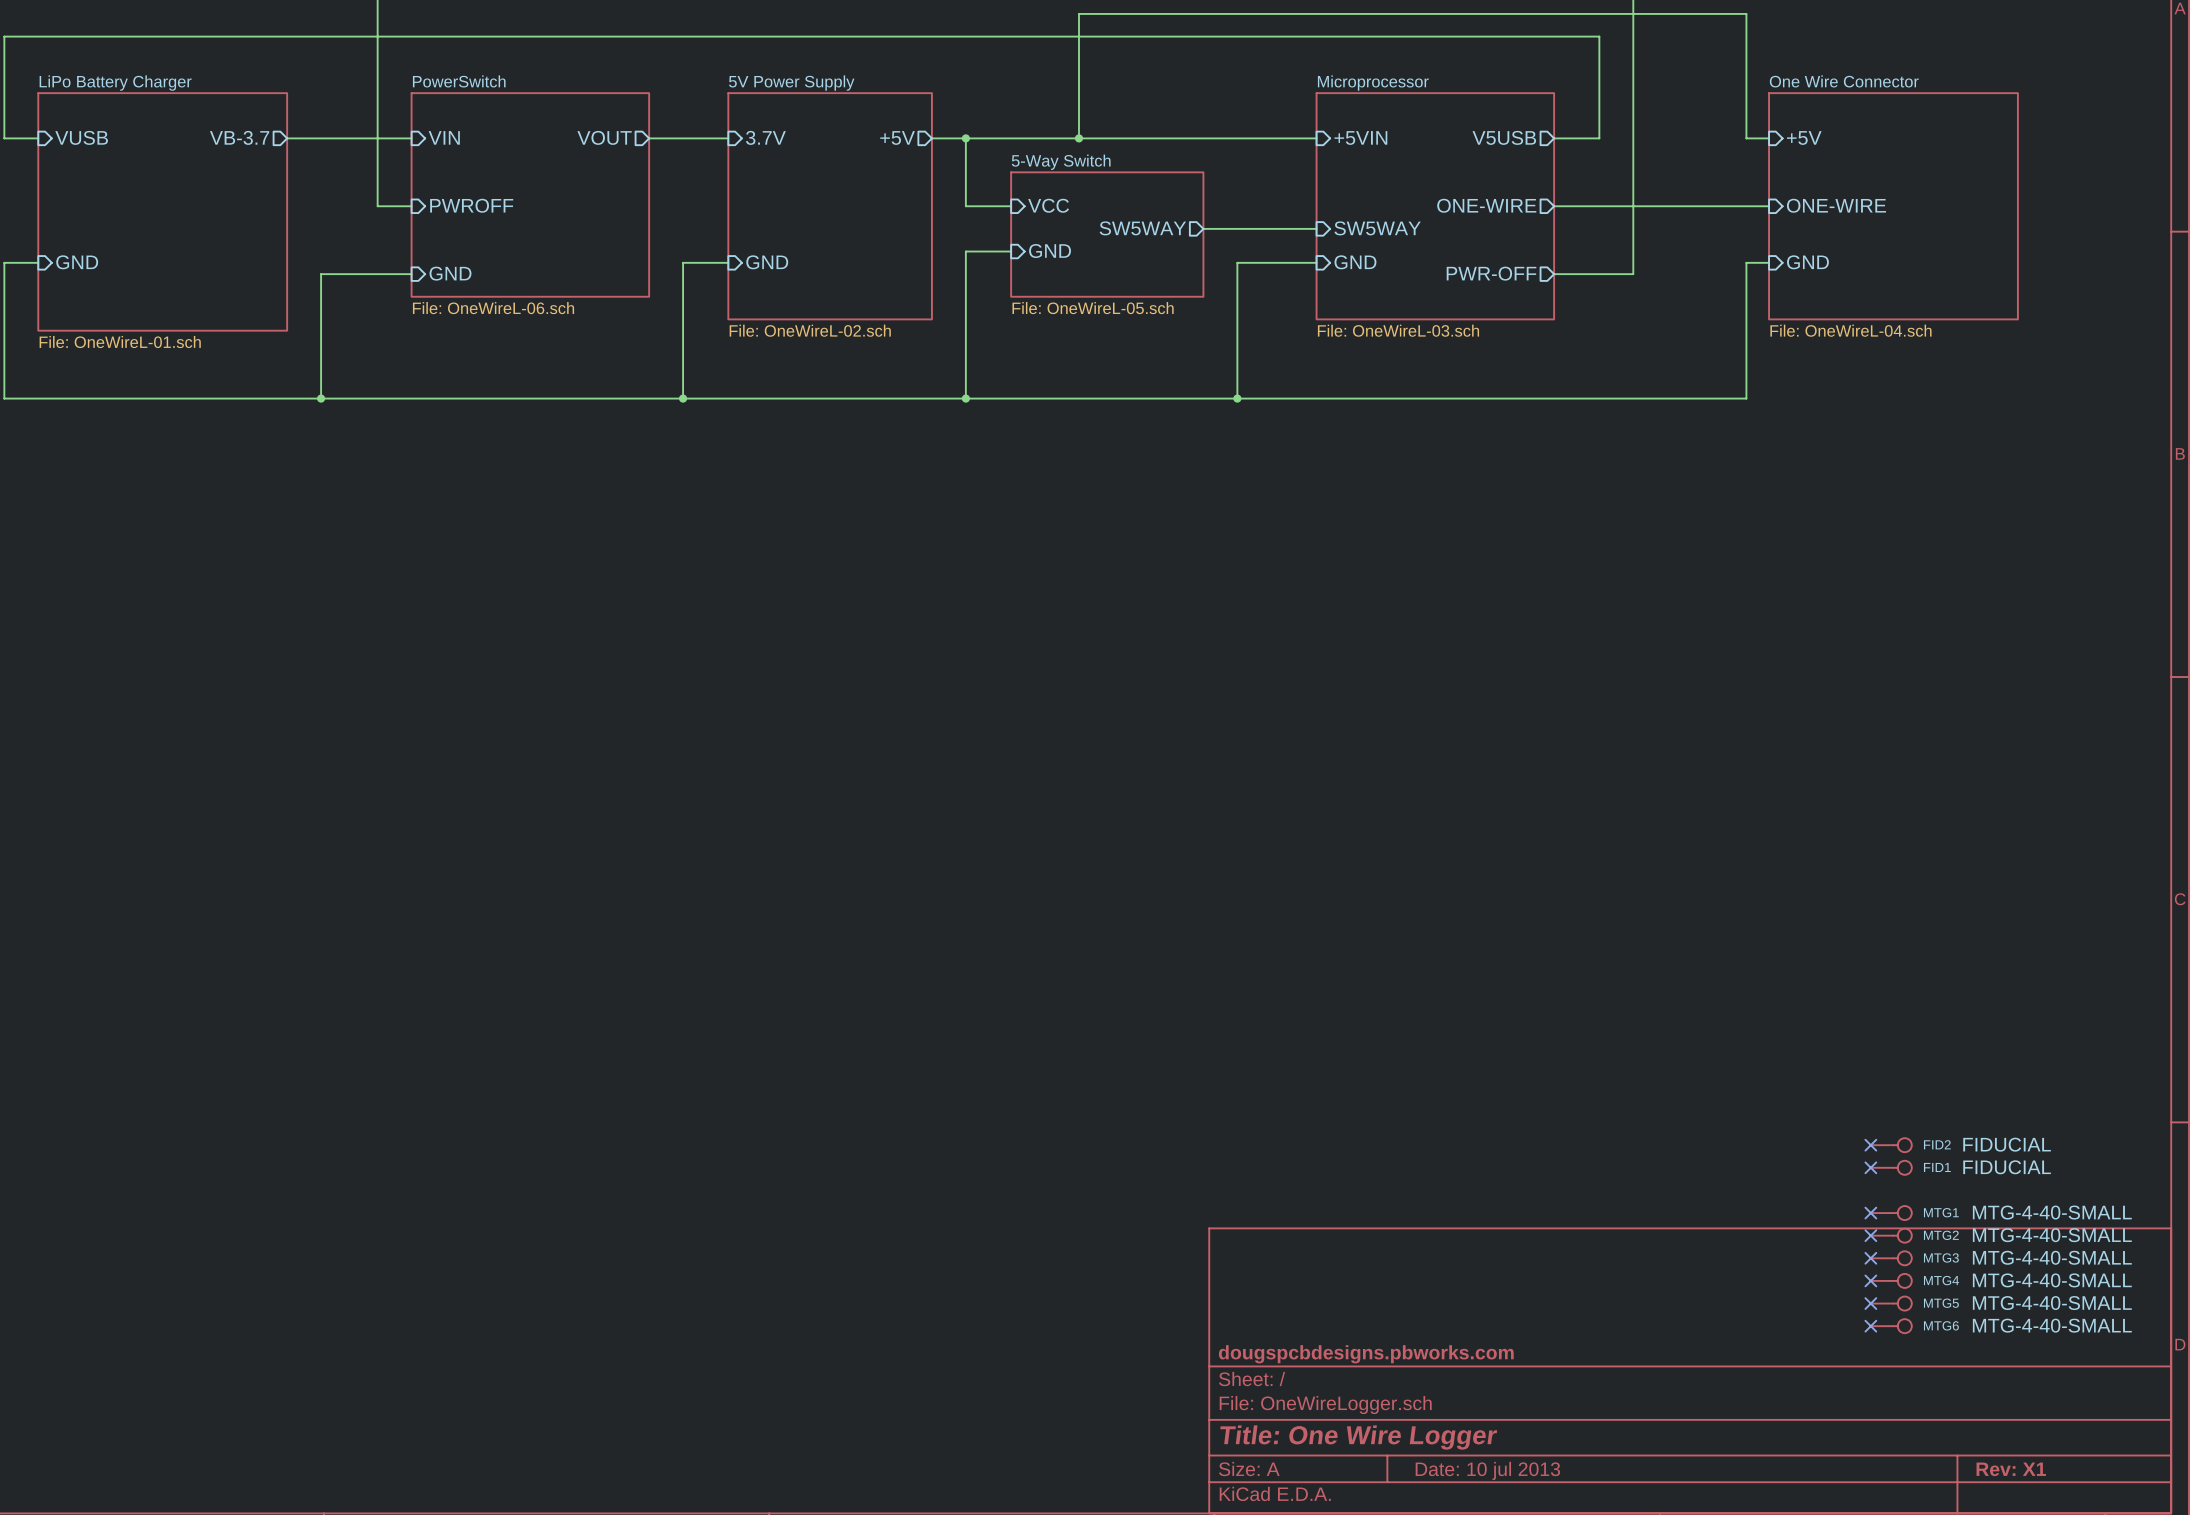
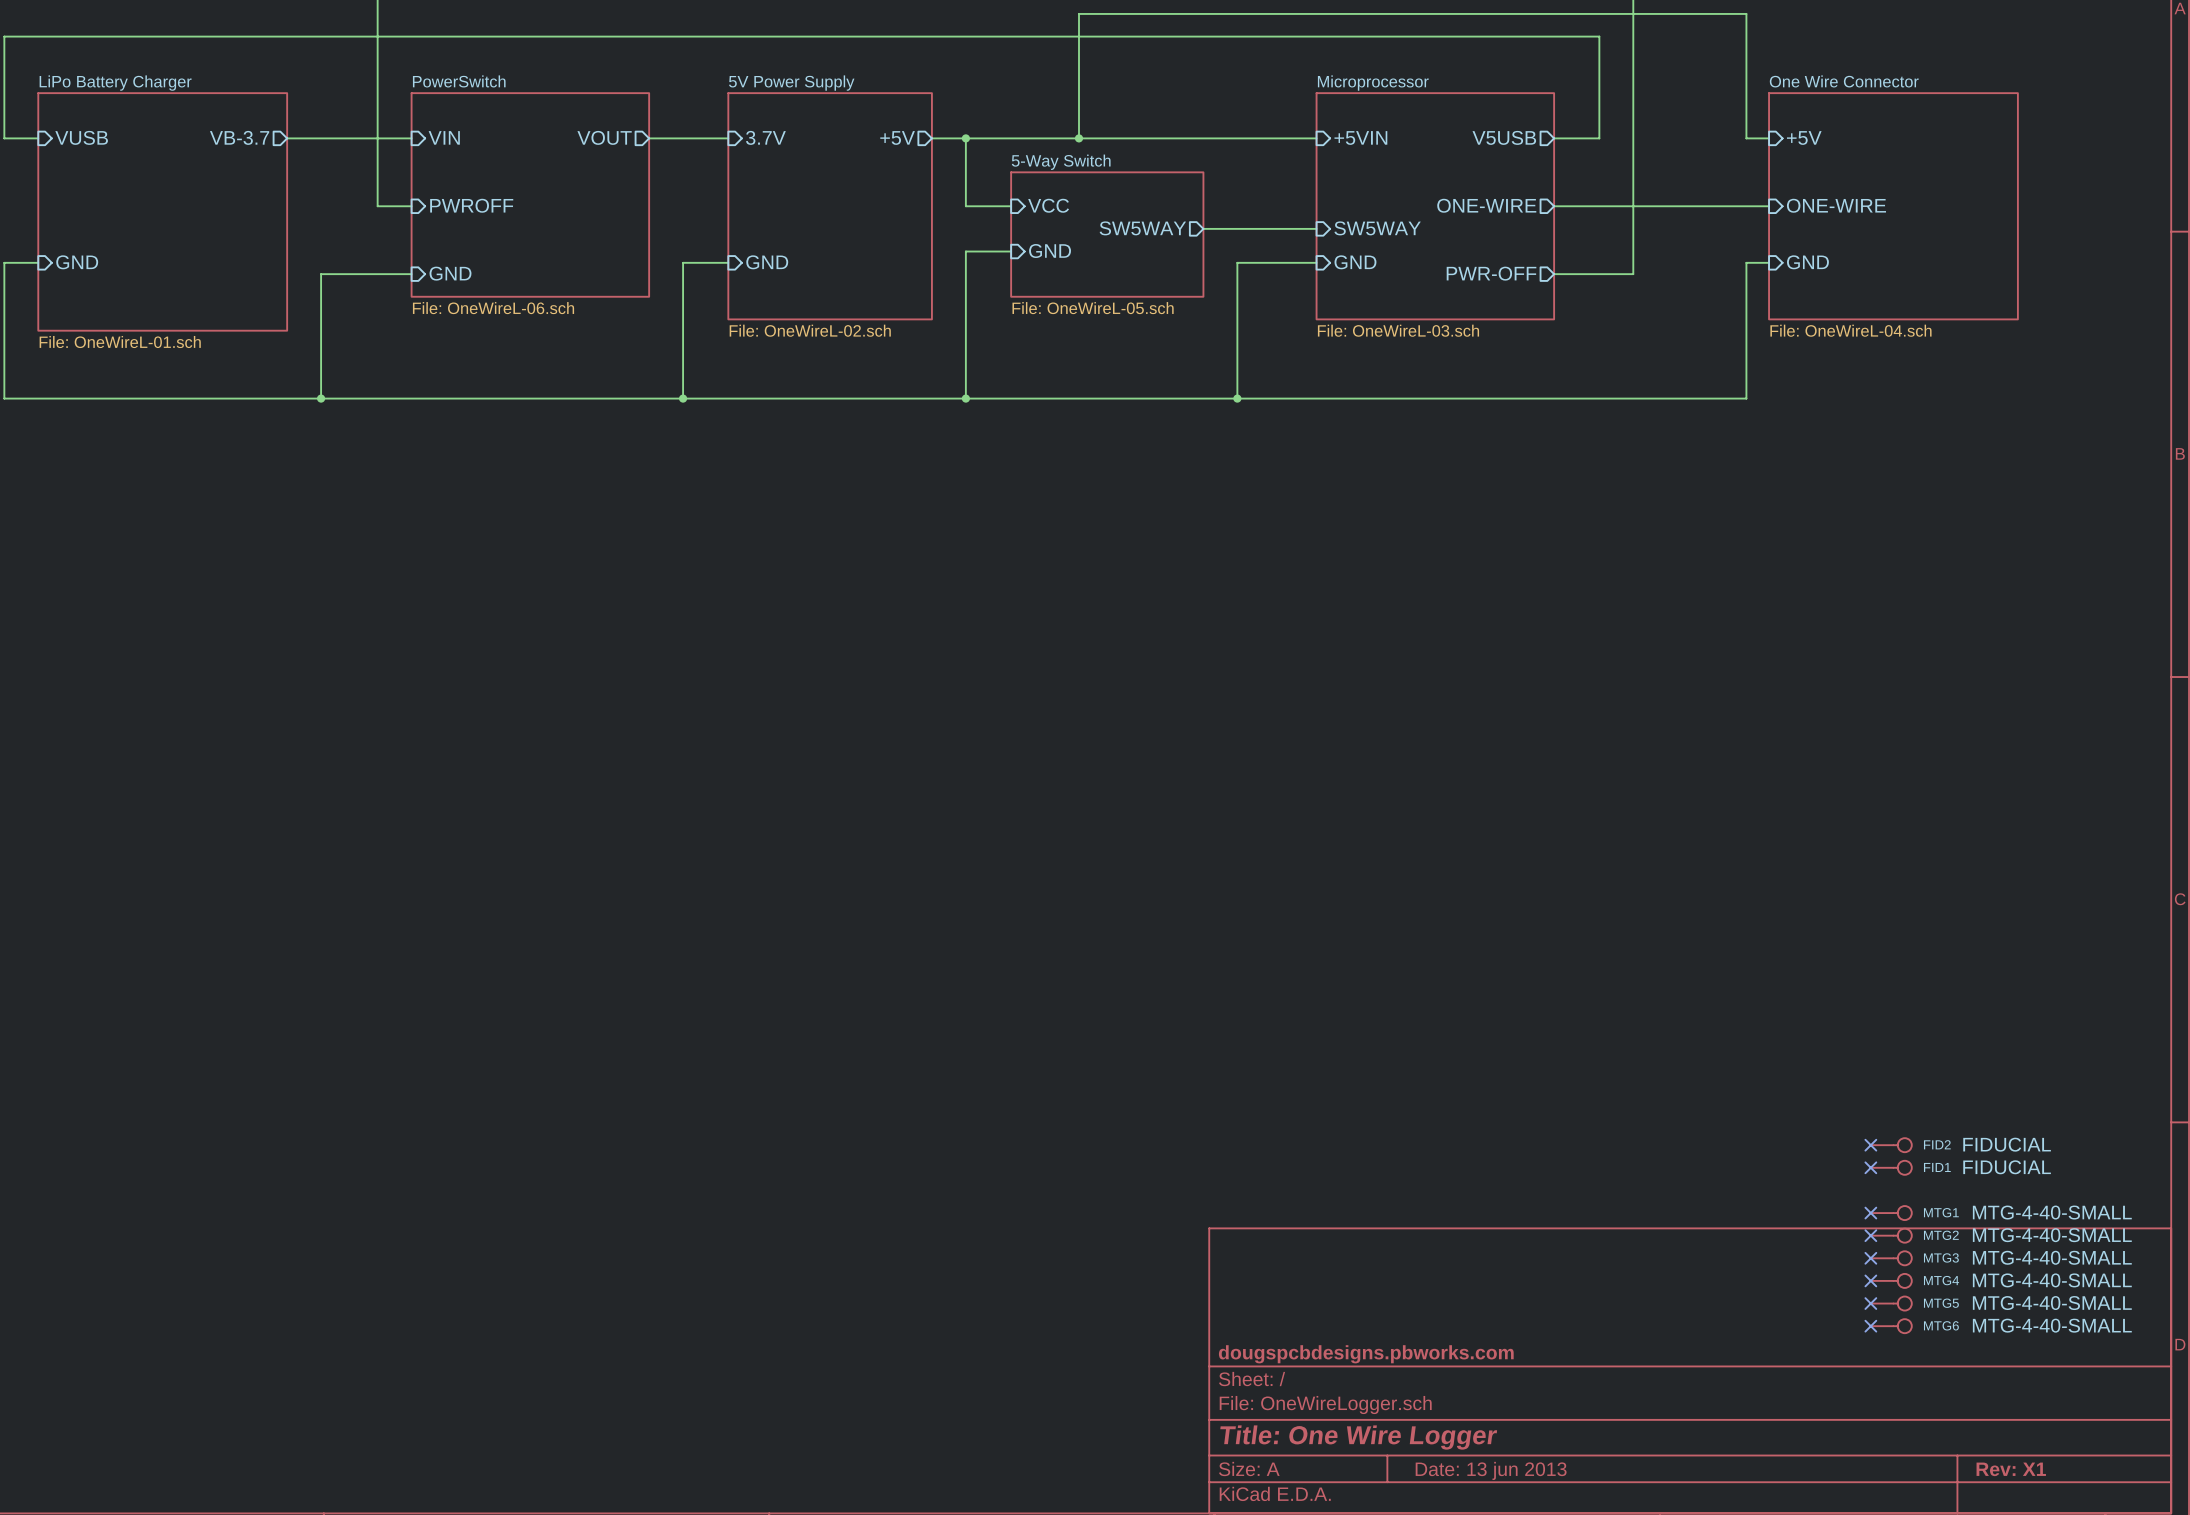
title block: Date: 10 jul 2013 (1487, 1470) -> Date: 13 jun 2013 (1491, 1470)

